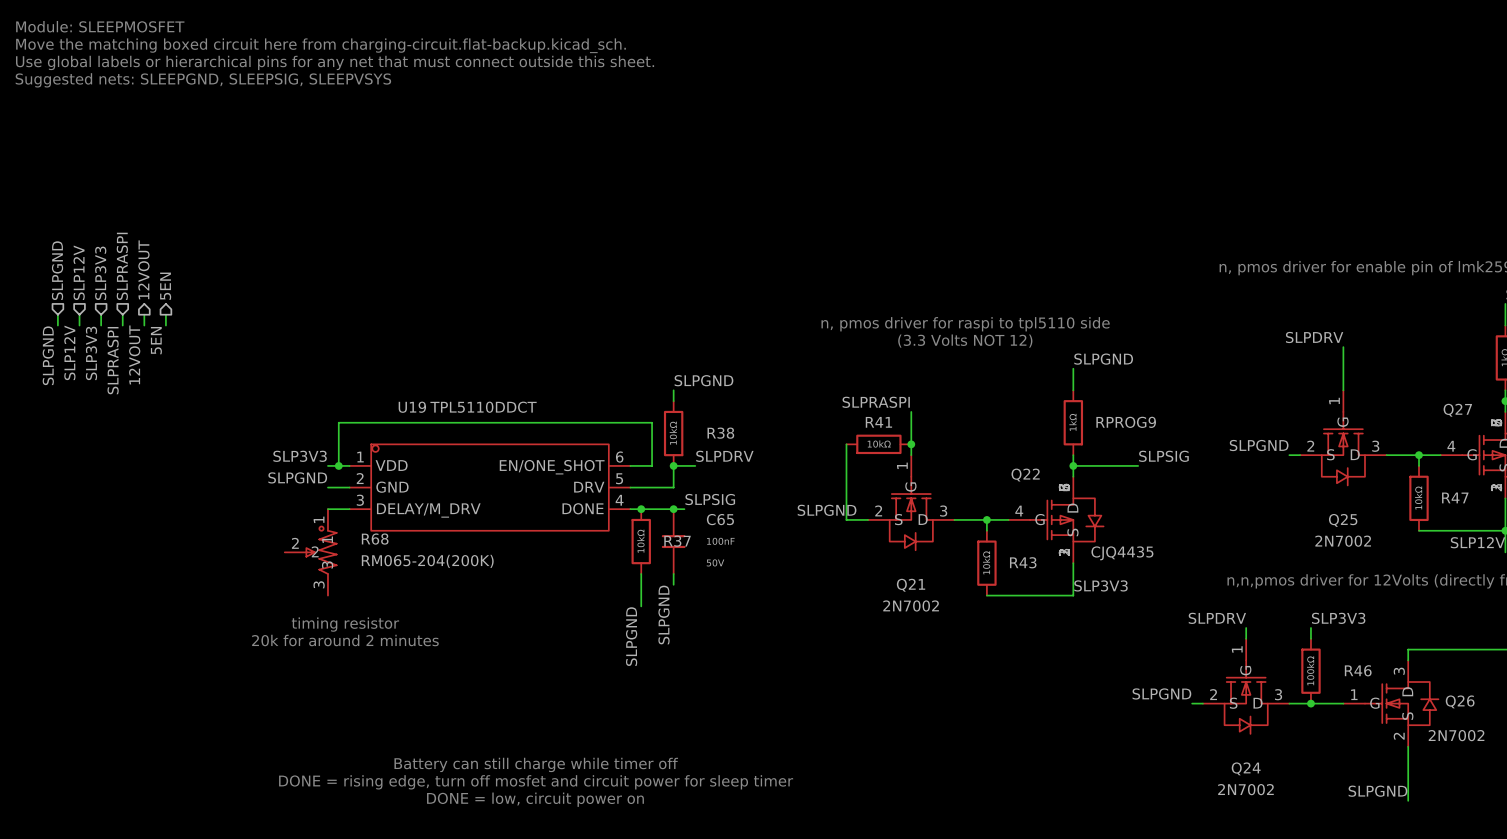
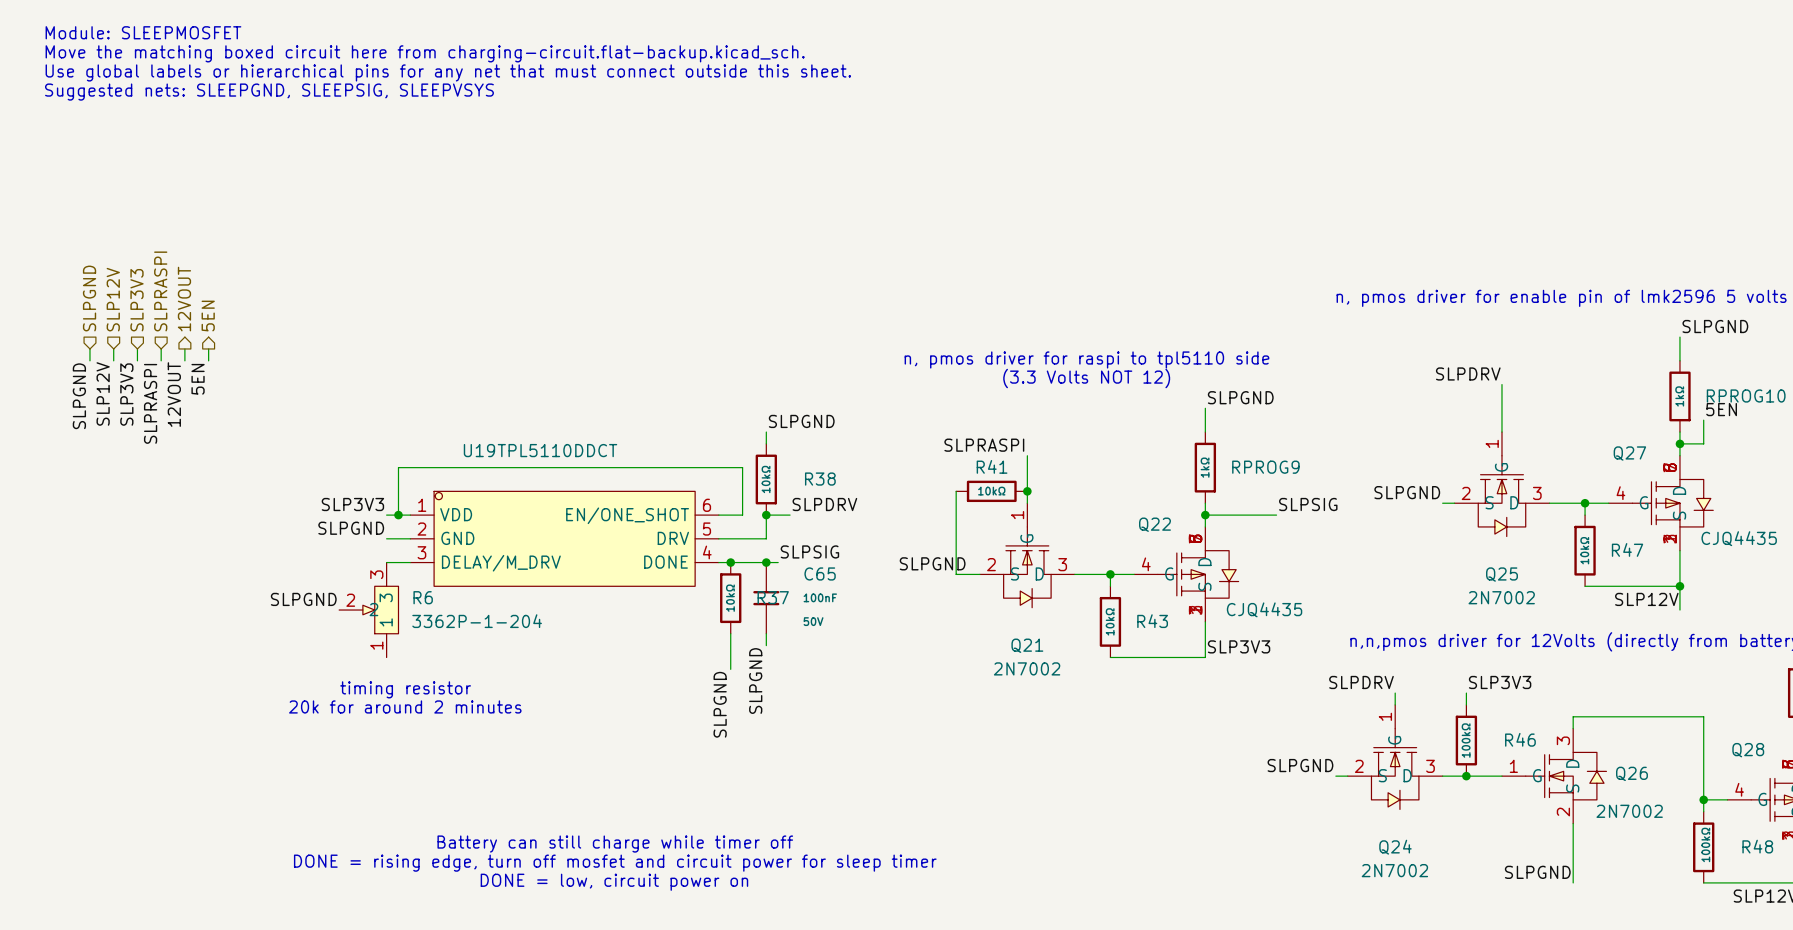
label: none -> SLPGND (303, 599)
R68: RM065-204(200K) (310, 552) -> none
R6: none -> 3362P-1-204 (368, 610)

